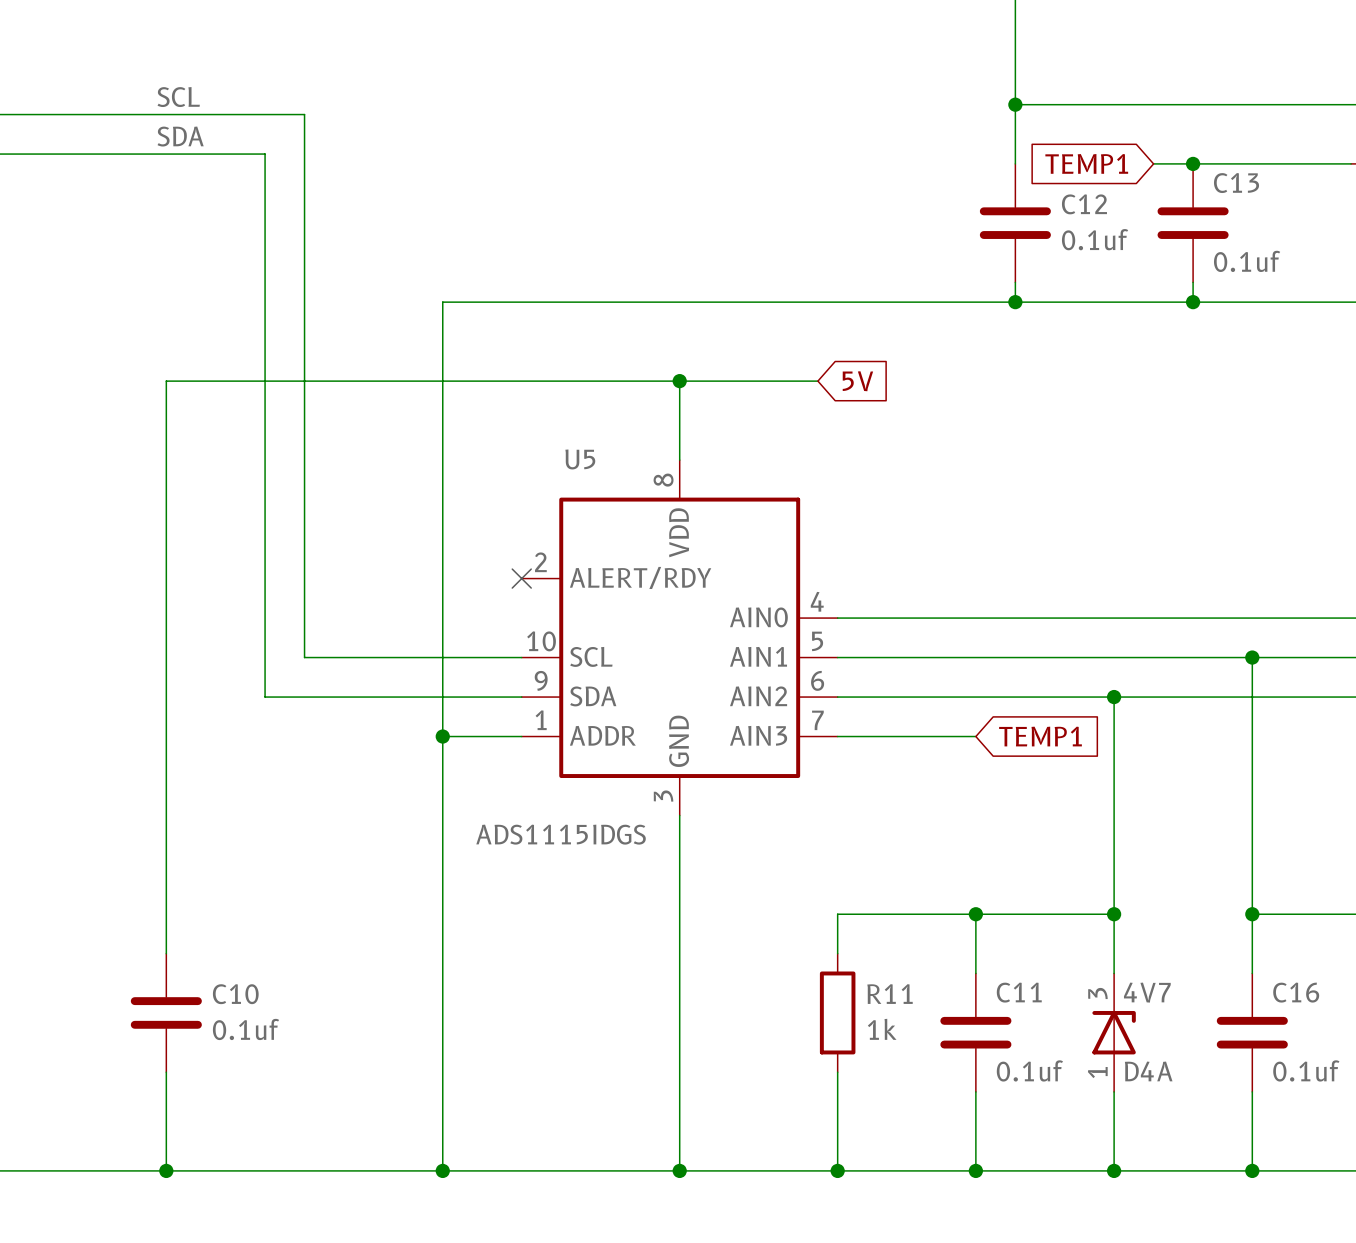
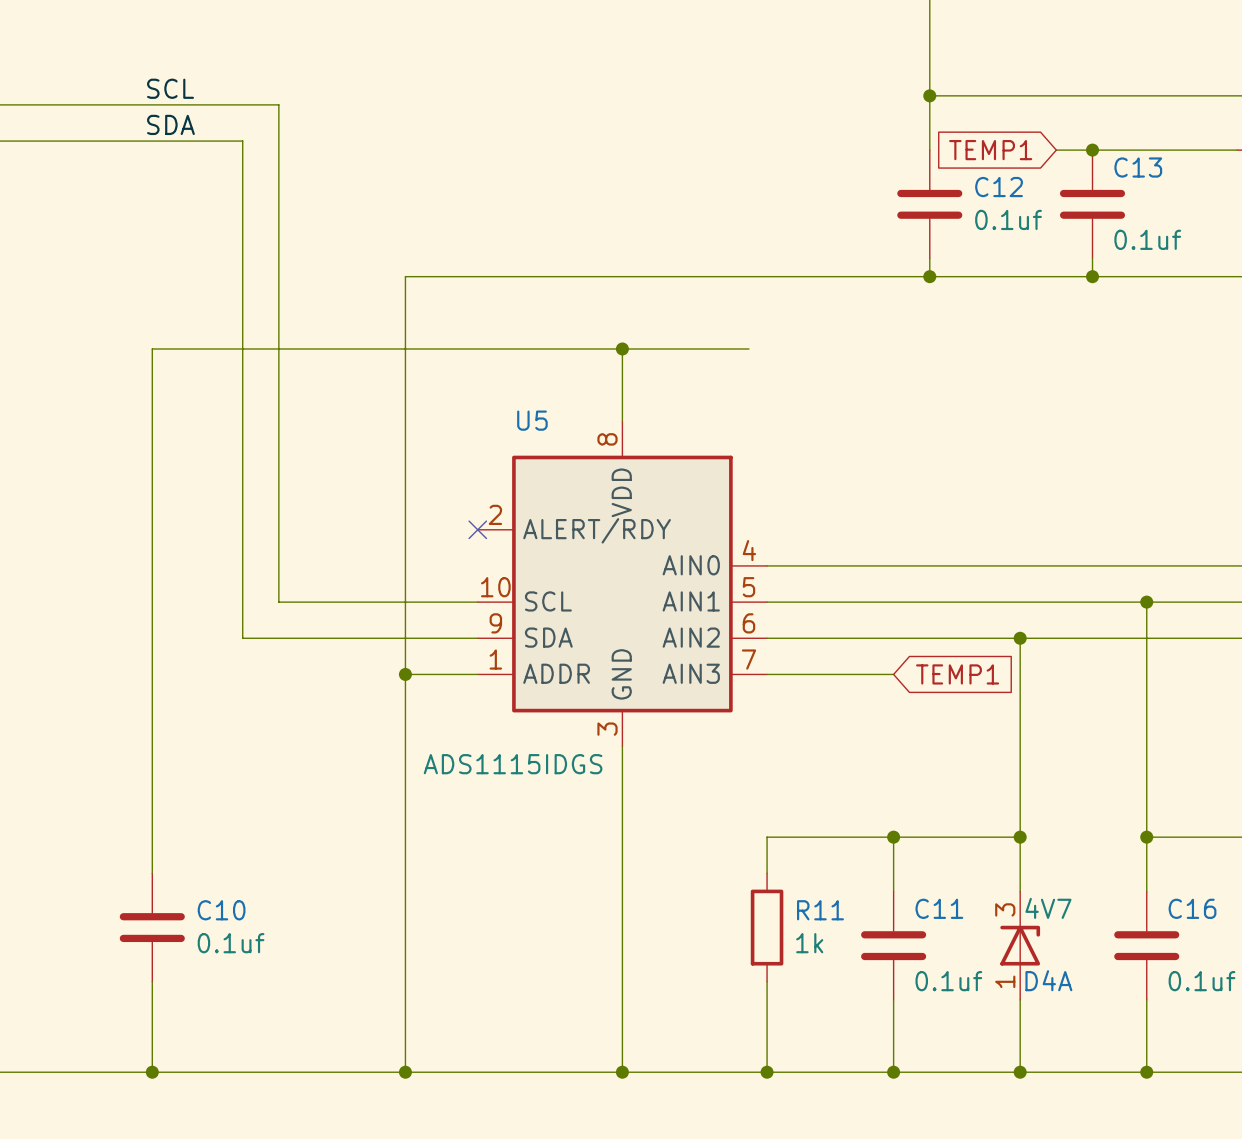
global label: 5V (857, 381) -> none

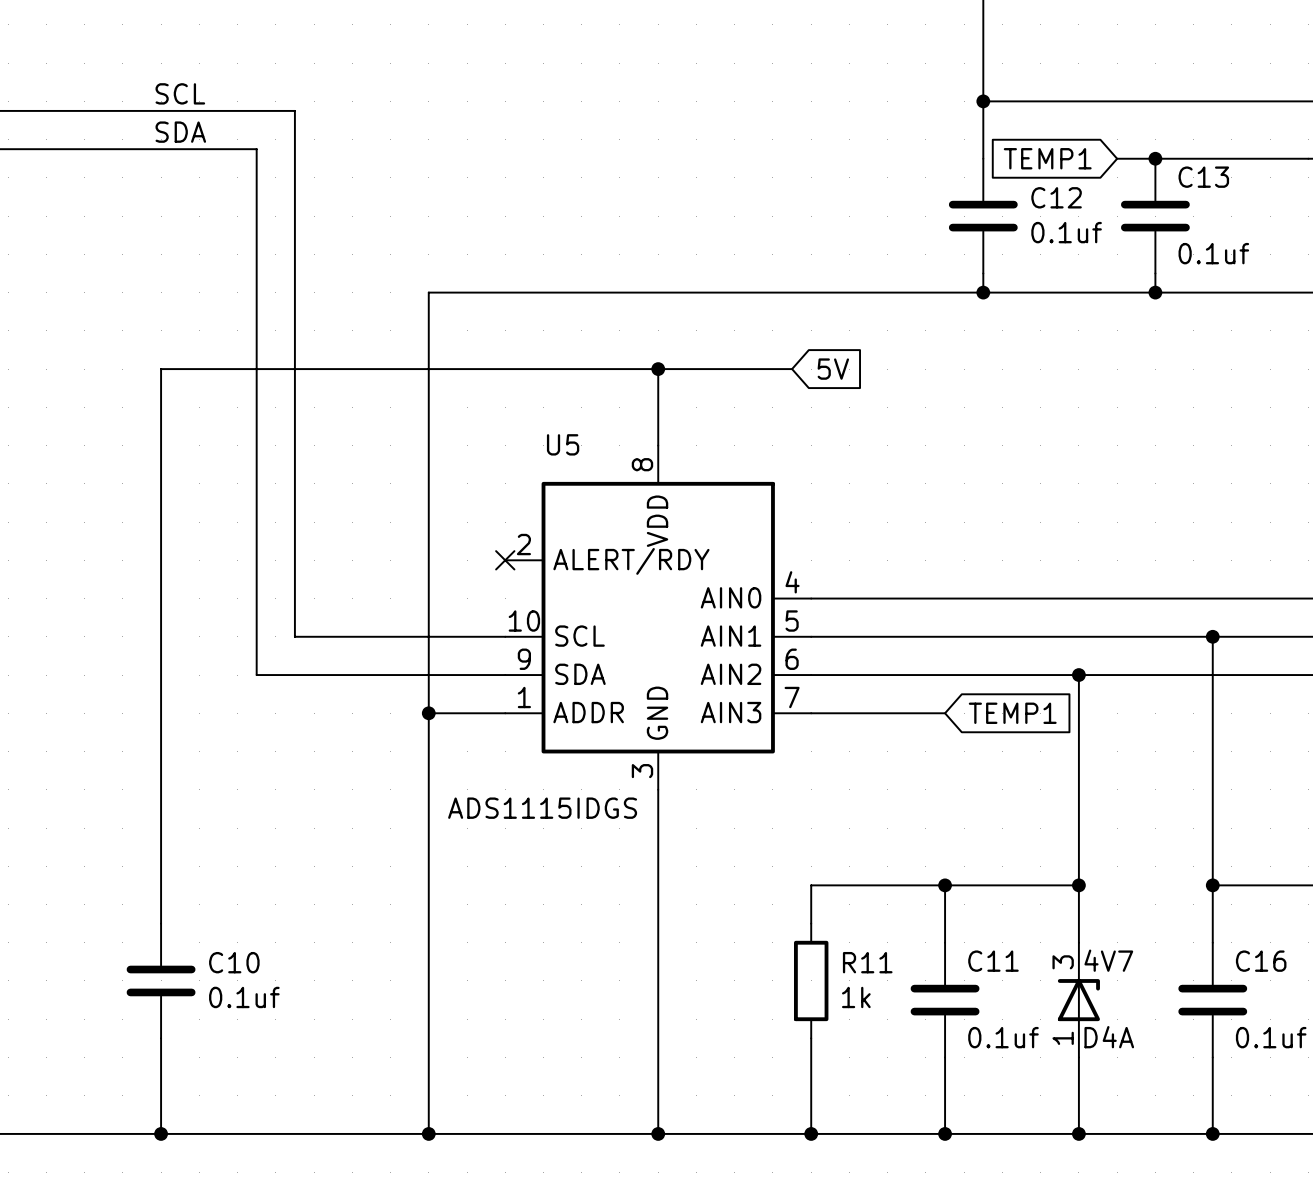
global label: none -> 5V (833, 369)

